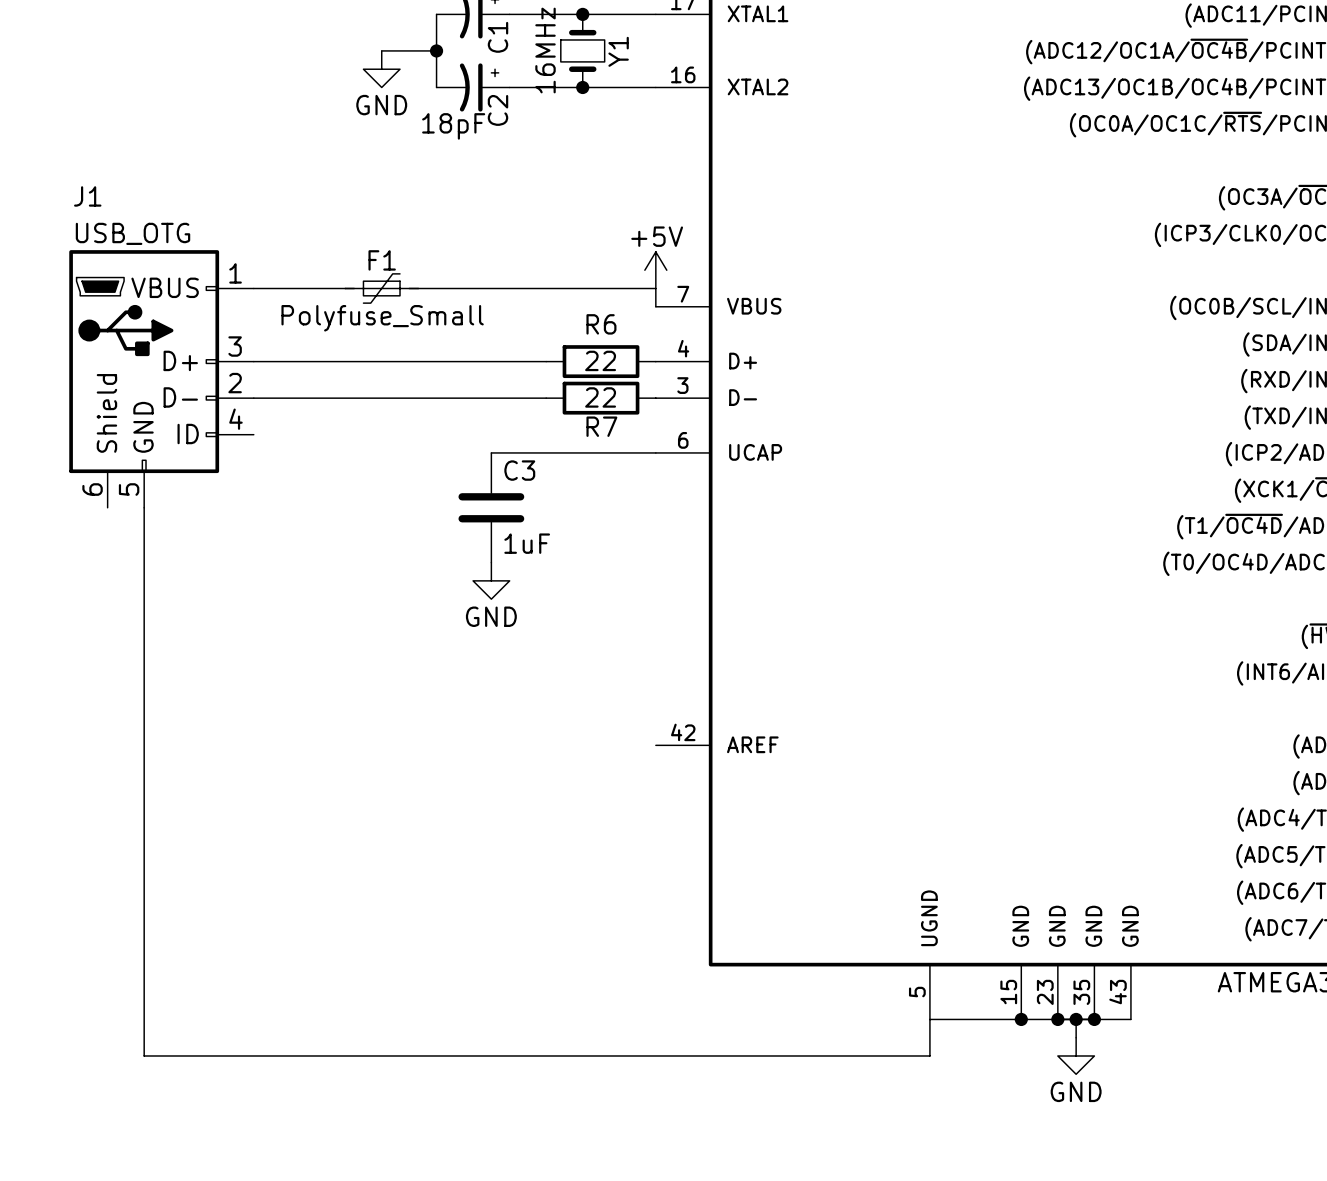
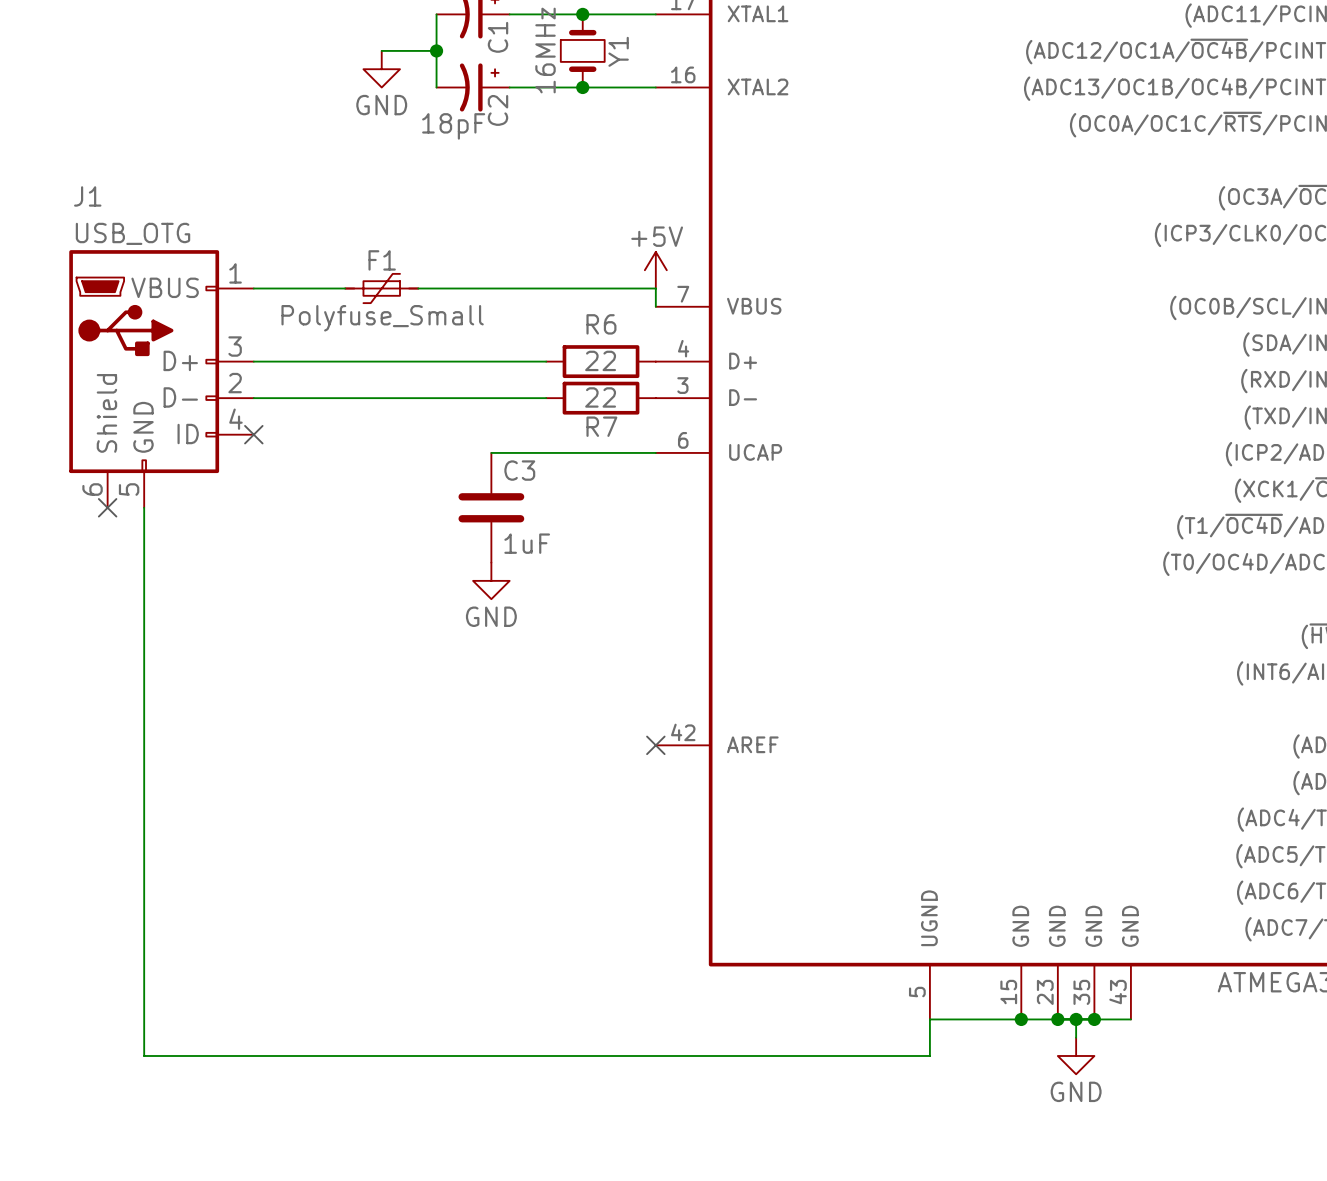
no-connect mark: none -> (253, 434)
no-connect mark: none -> (107, 507)
no-connect mark: none -> (655, 745)

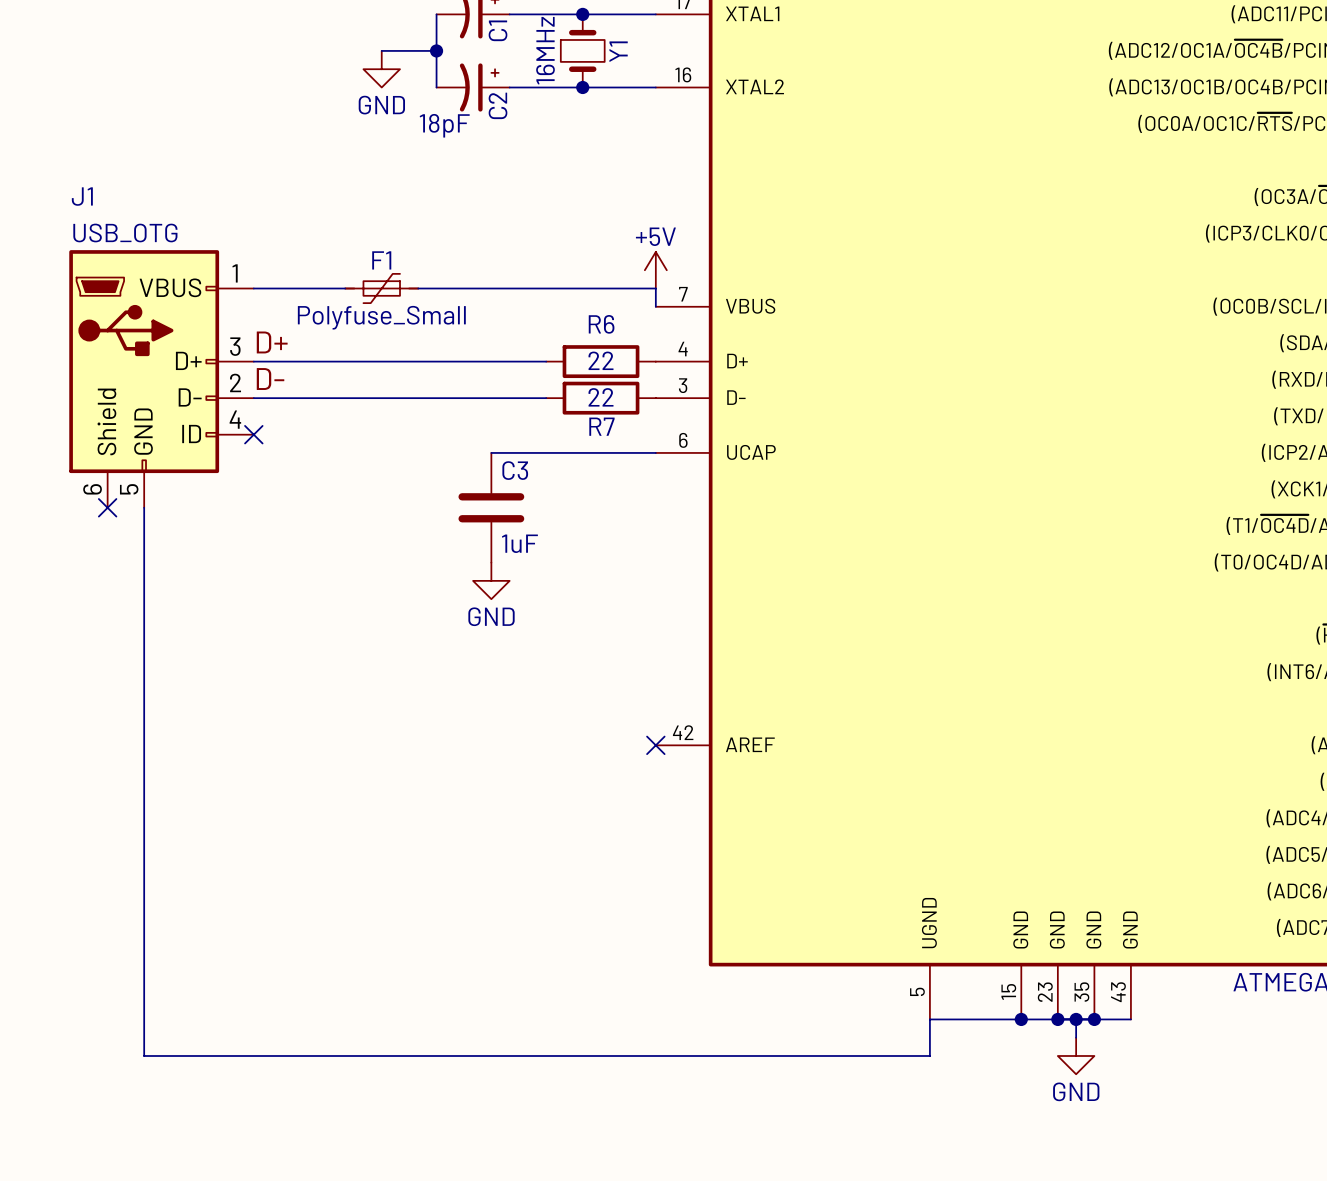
label: none -> D+ (272, 342)
label: none -> D- (270, 379)

